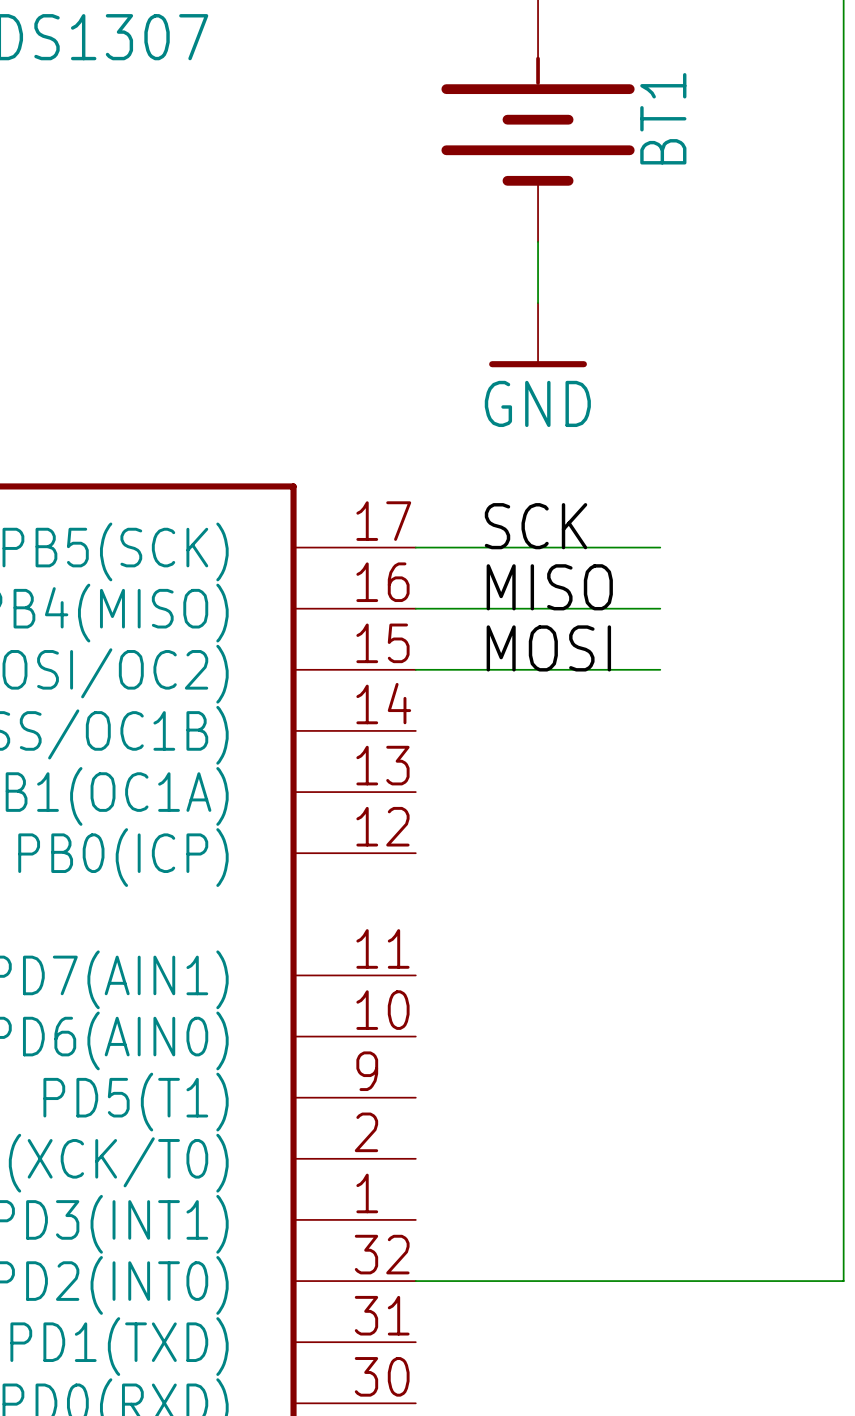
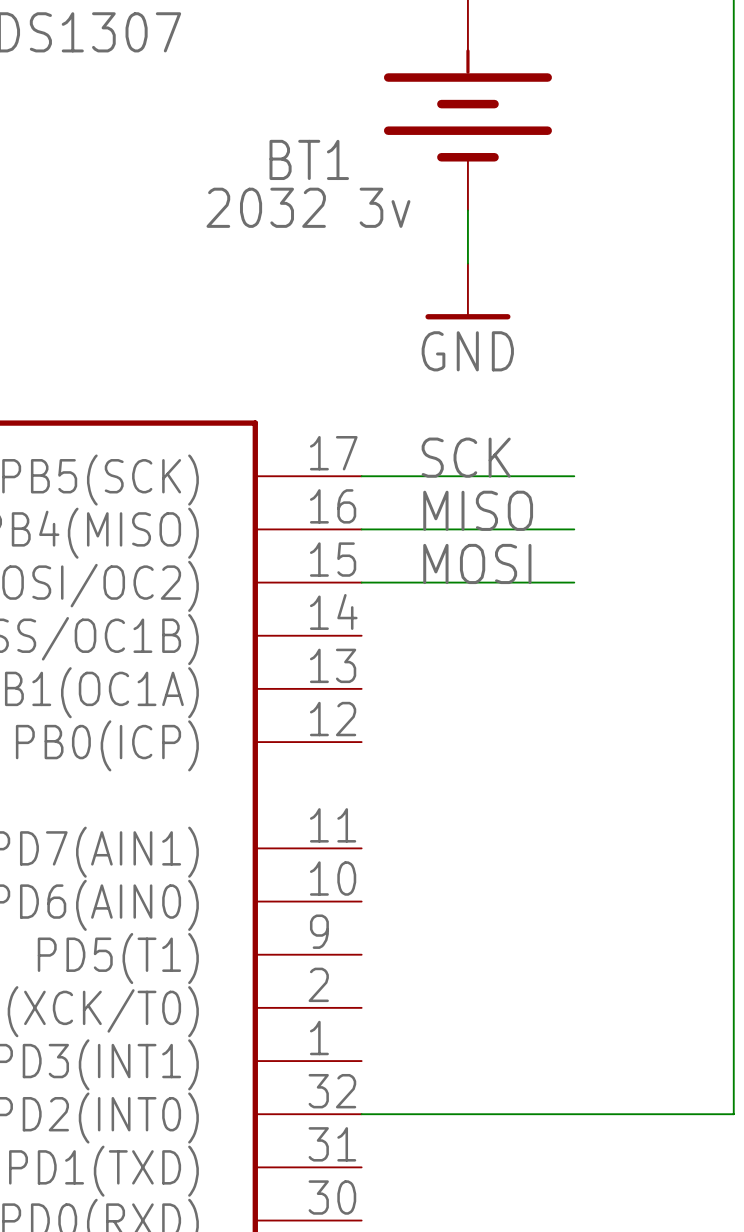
BT1 name rotation: 0° (663, 118) -> 90° clockwise (309, 159)
BT1 name position: BT1 (663, 118) -> BT1 (309, 159)
BT1 value: none -> 2032 3v (308, 207)

